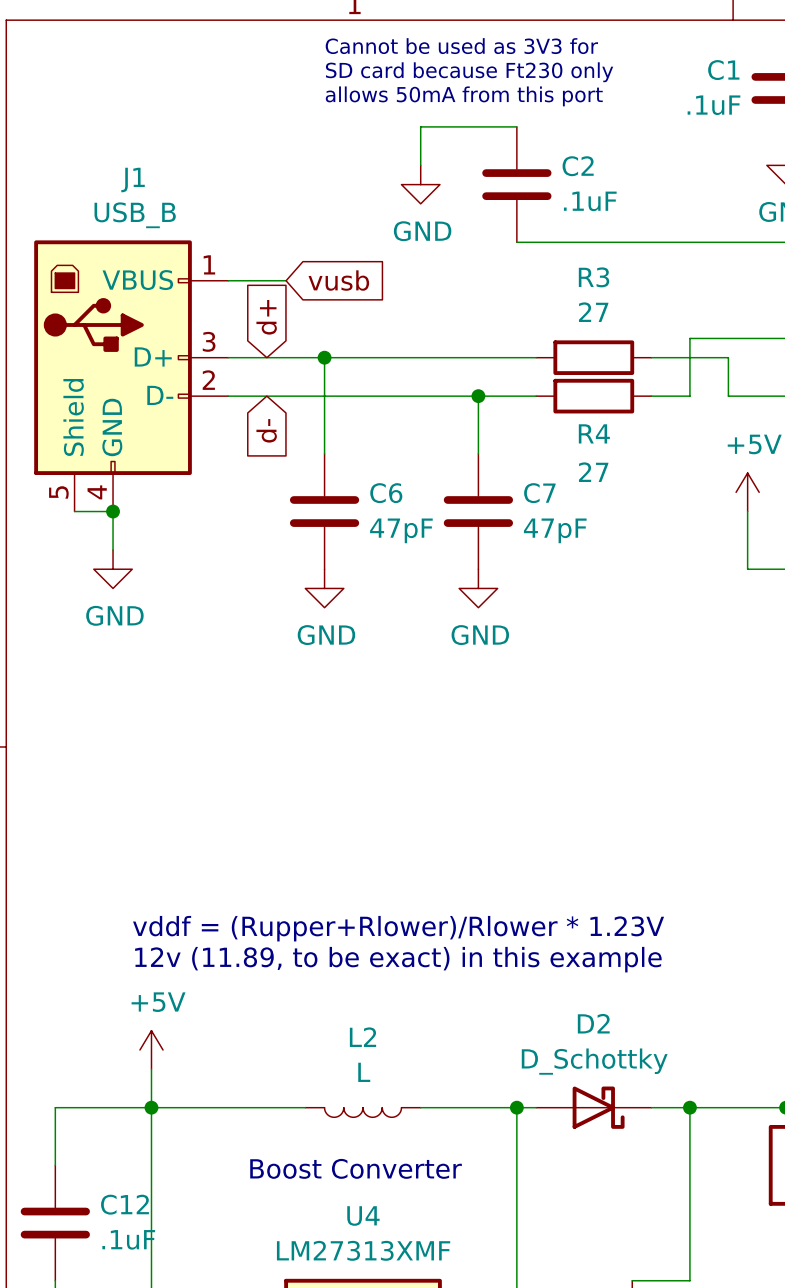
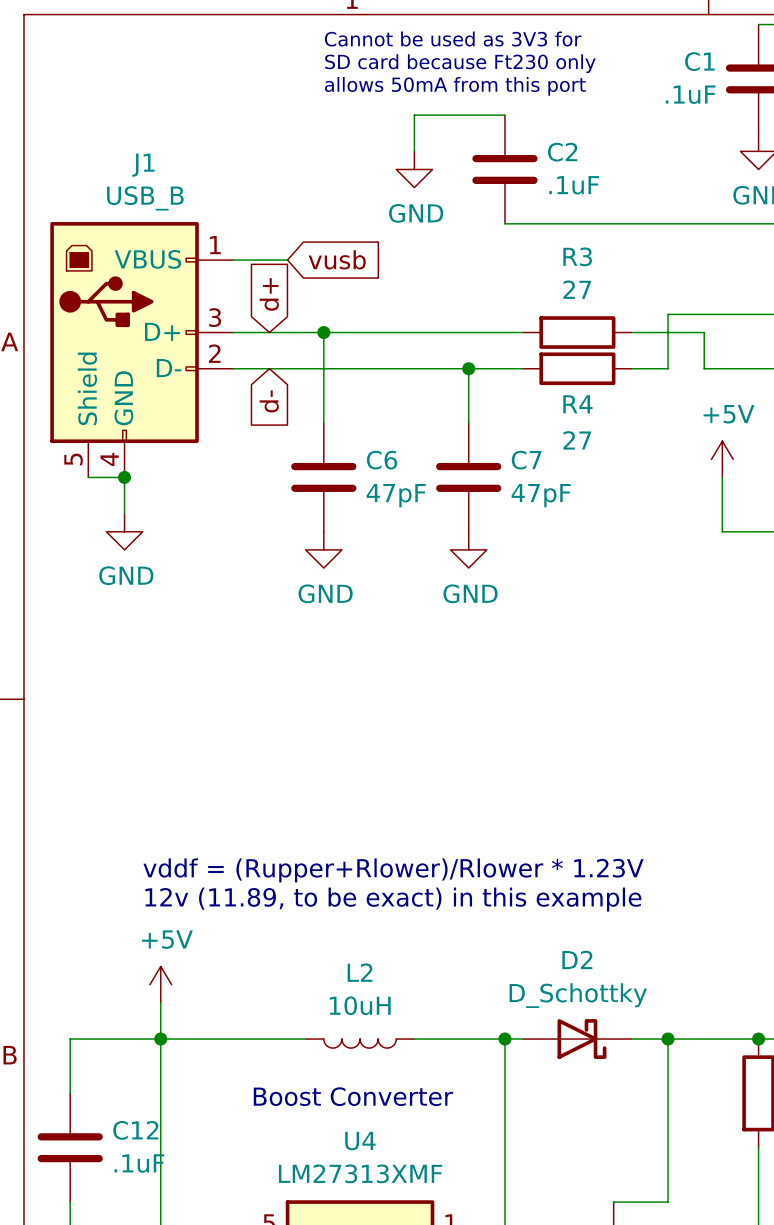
L2 value: L (364, 1072) -> 10uH (360, 1005)

